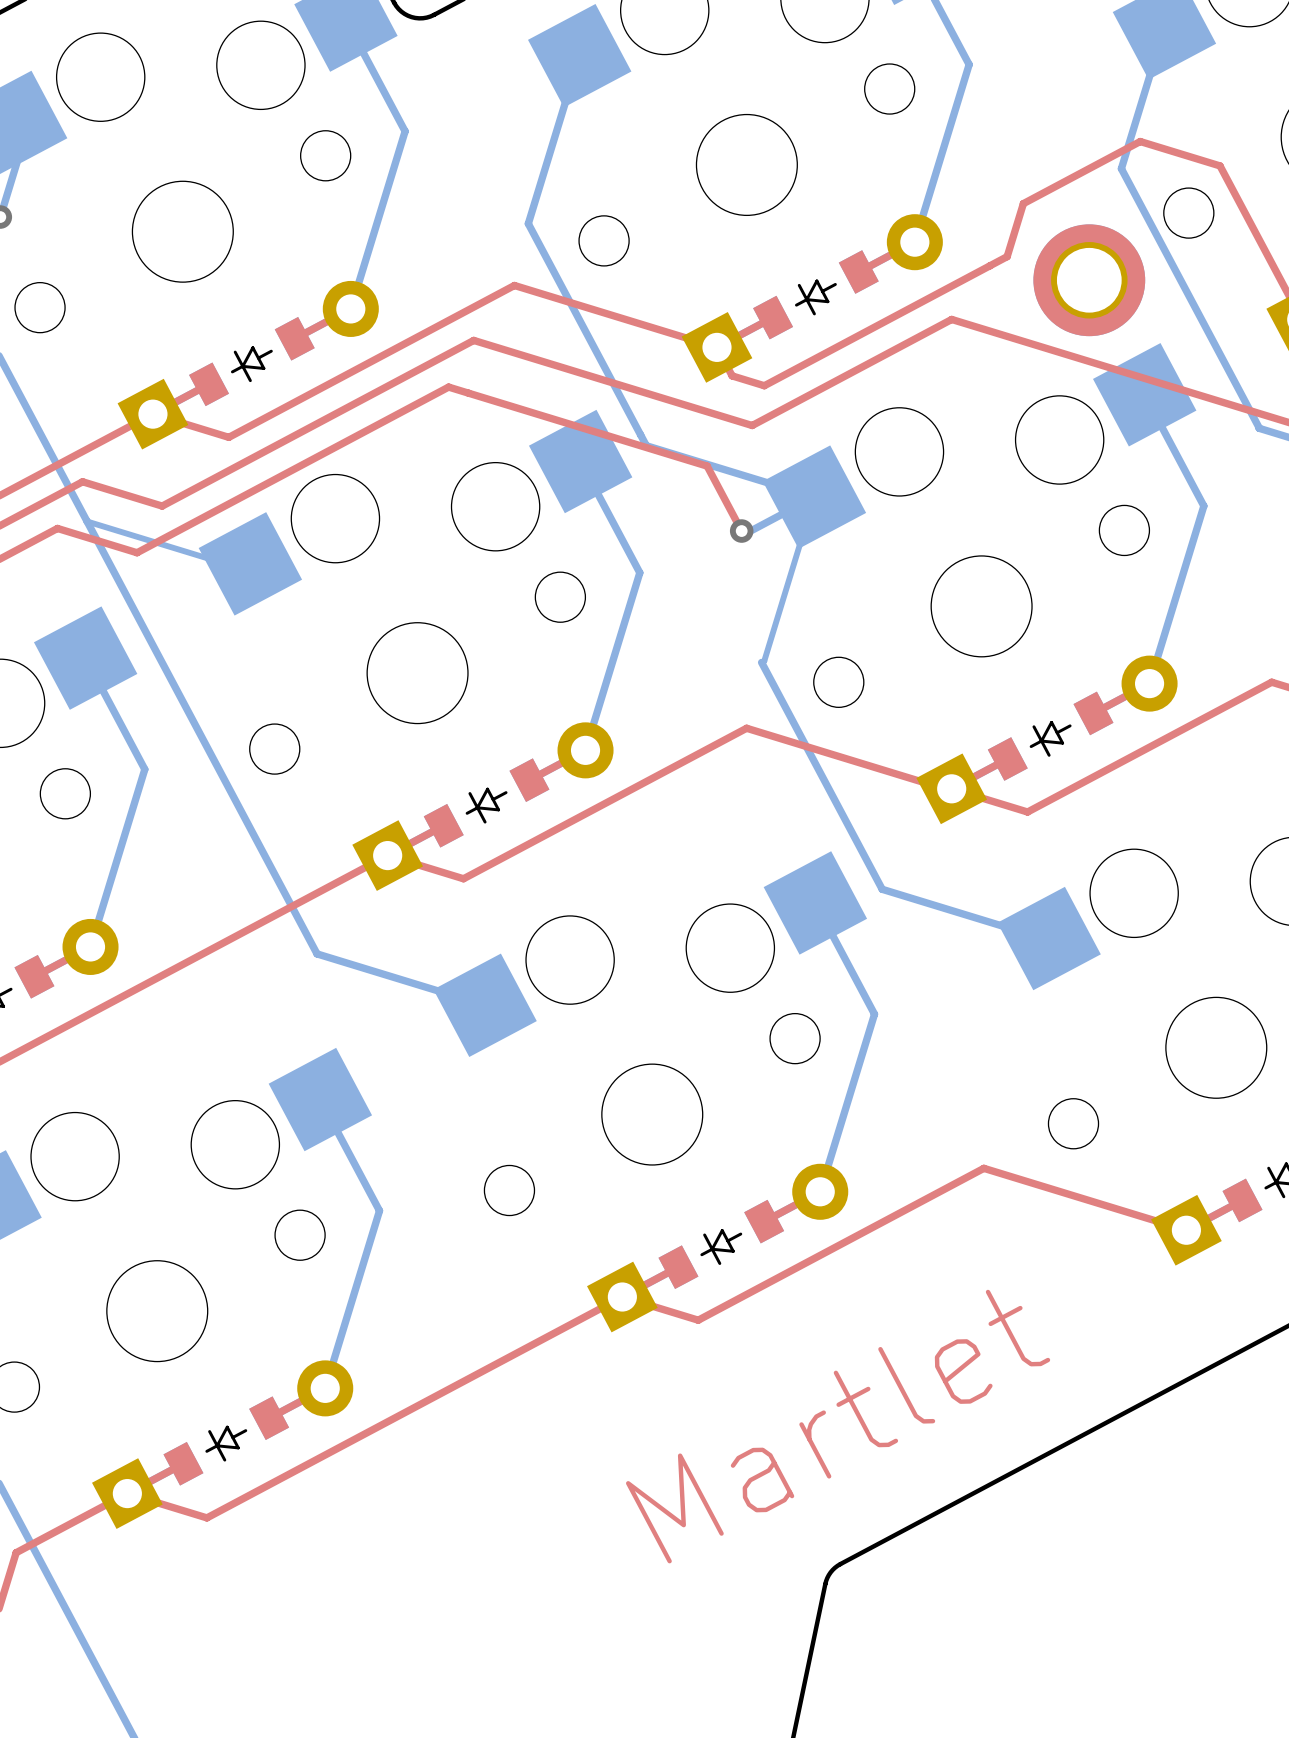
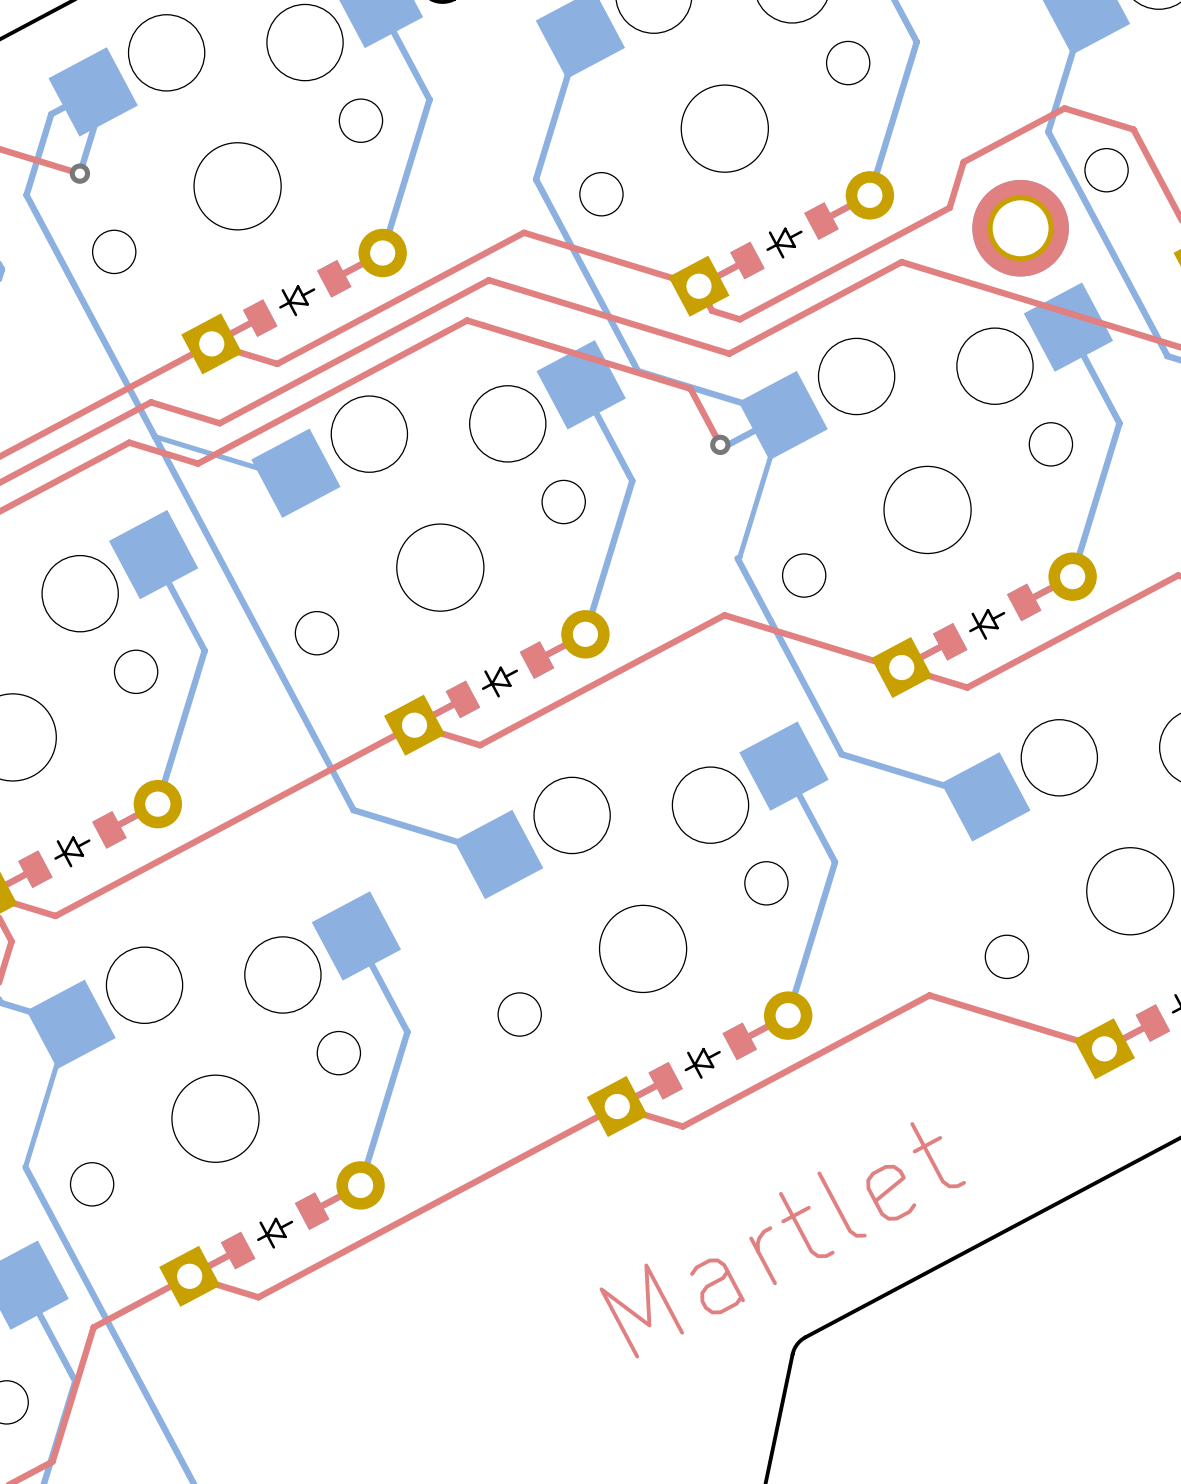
text position: Martlet (838, 1426) -> Martlet (782, 1240)

